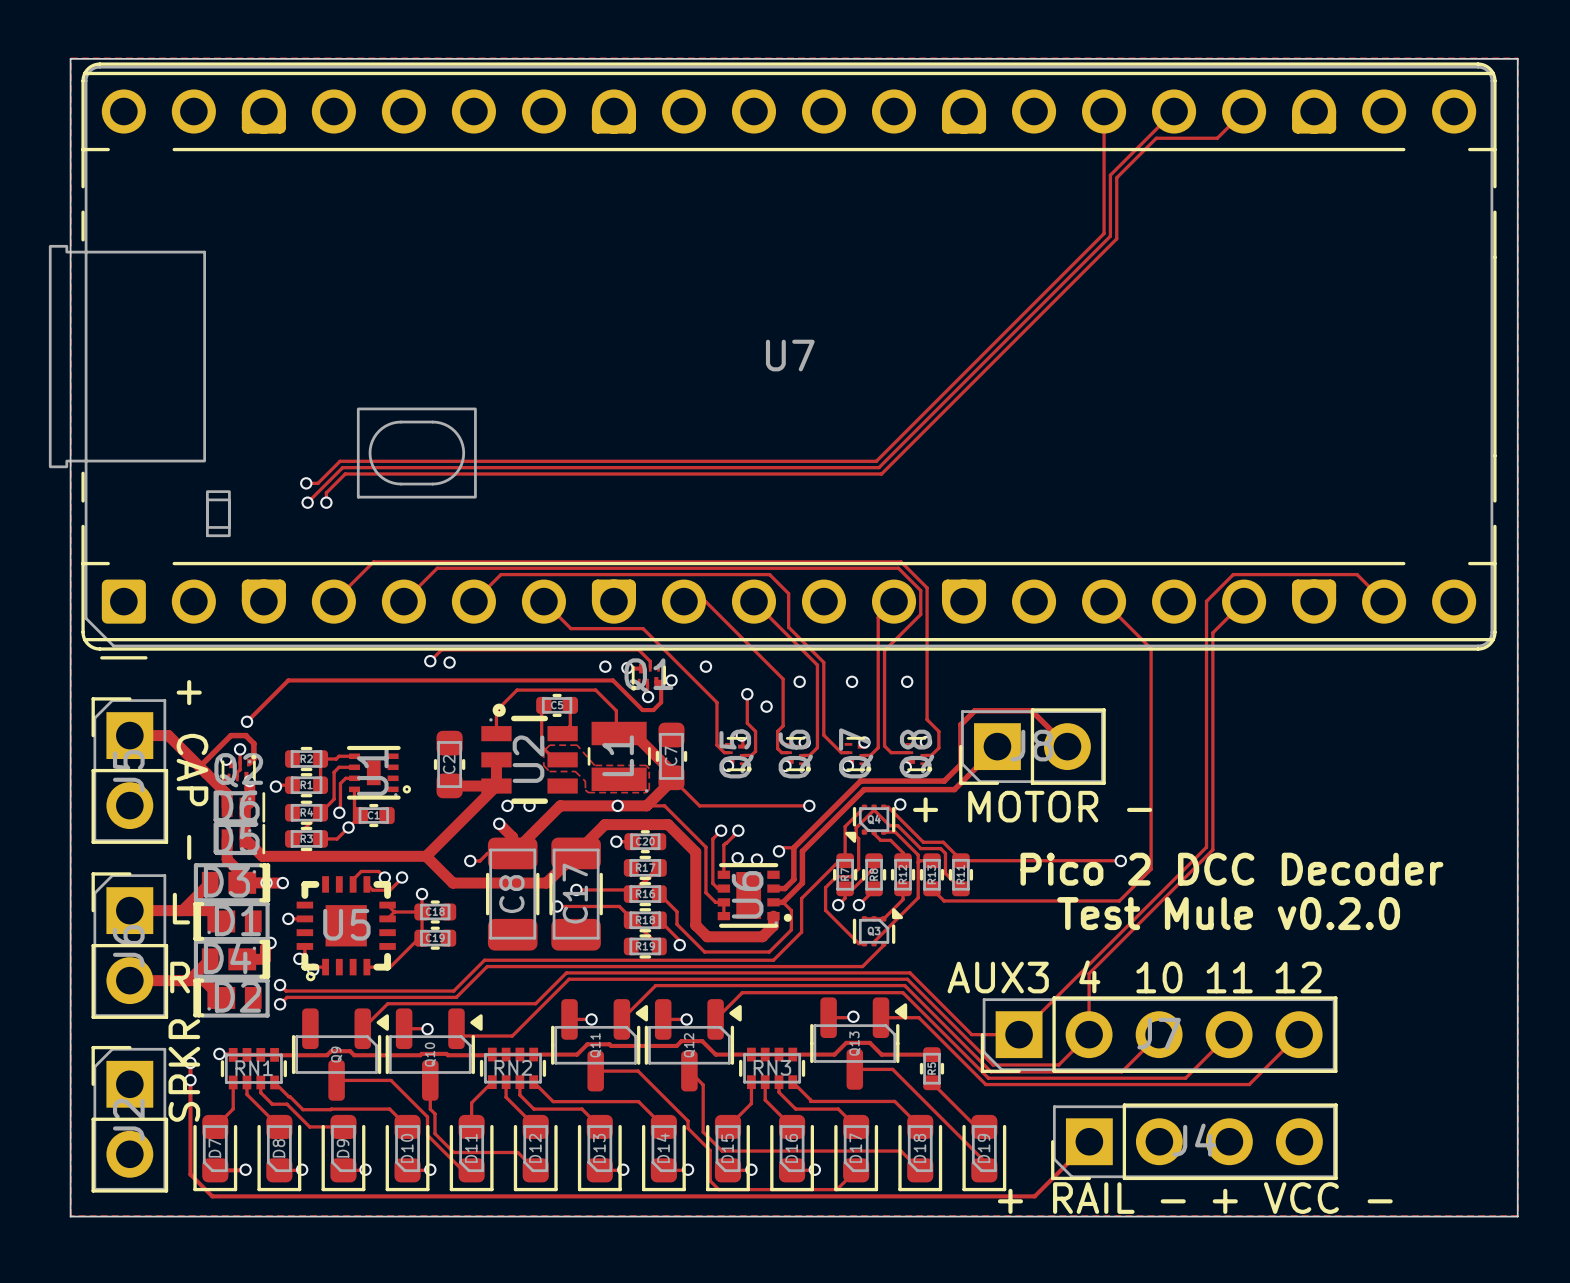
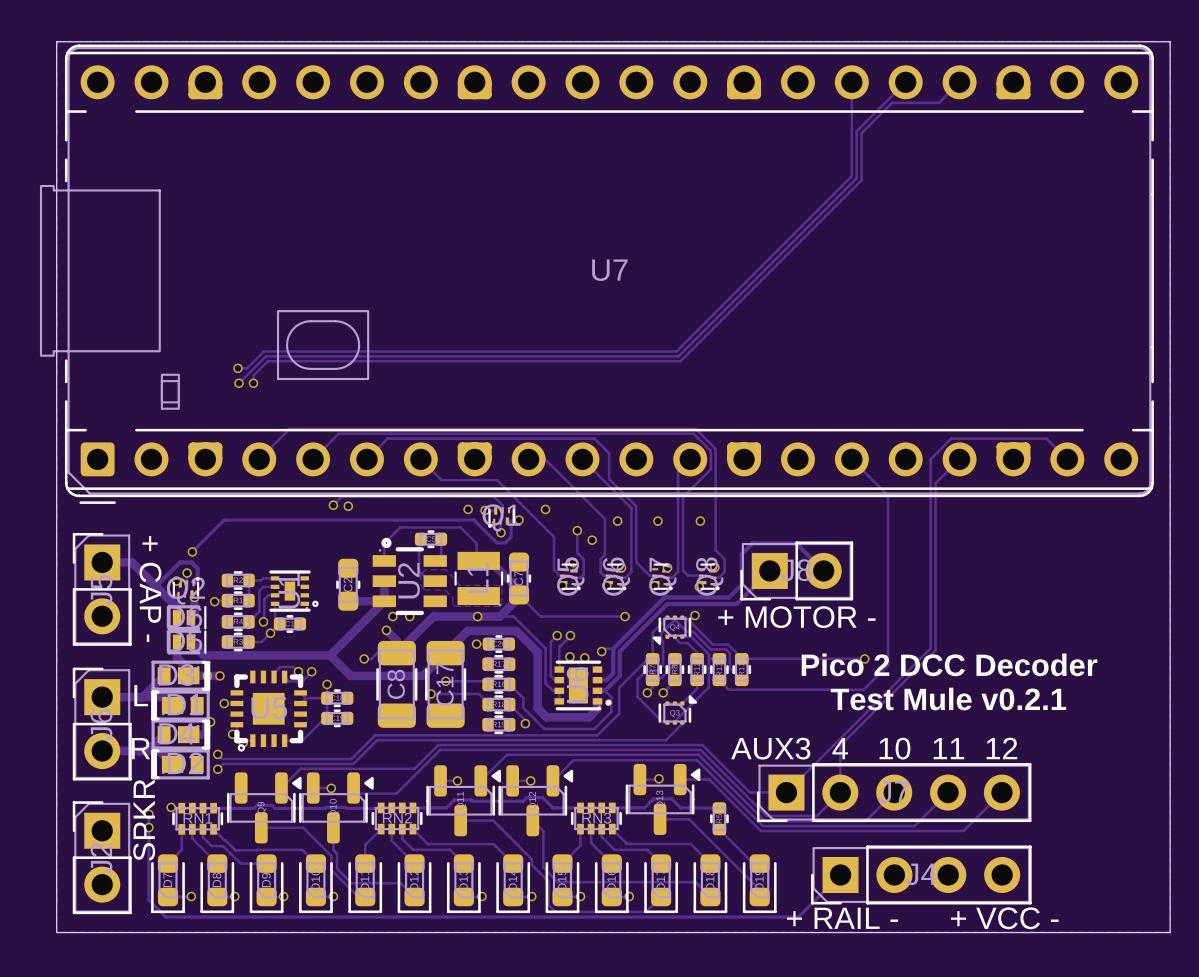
text: Test Mule v0.2.0 (1228, 913) -> Test Mule v0.2.1 (948, 699)

